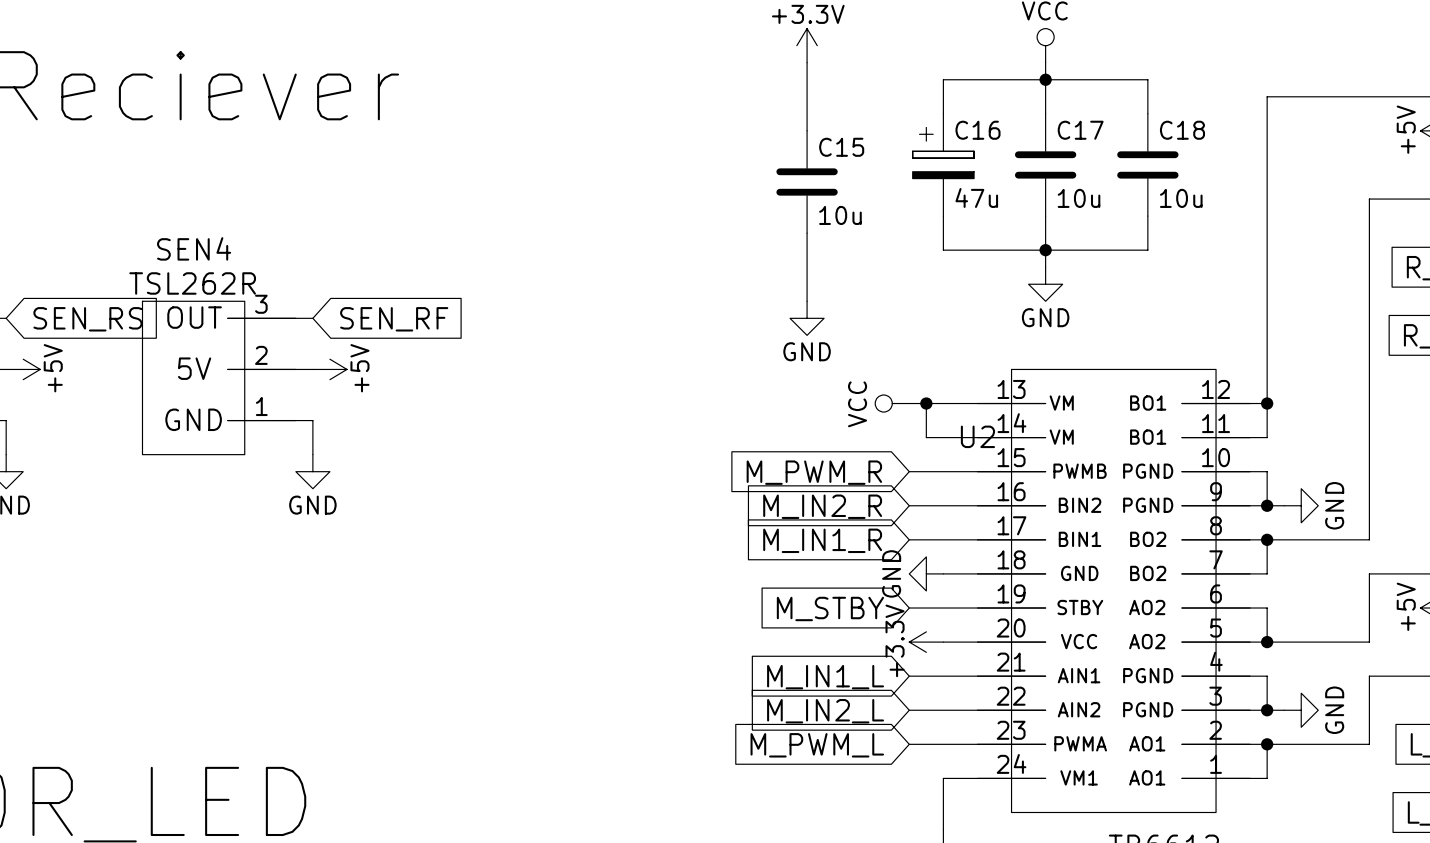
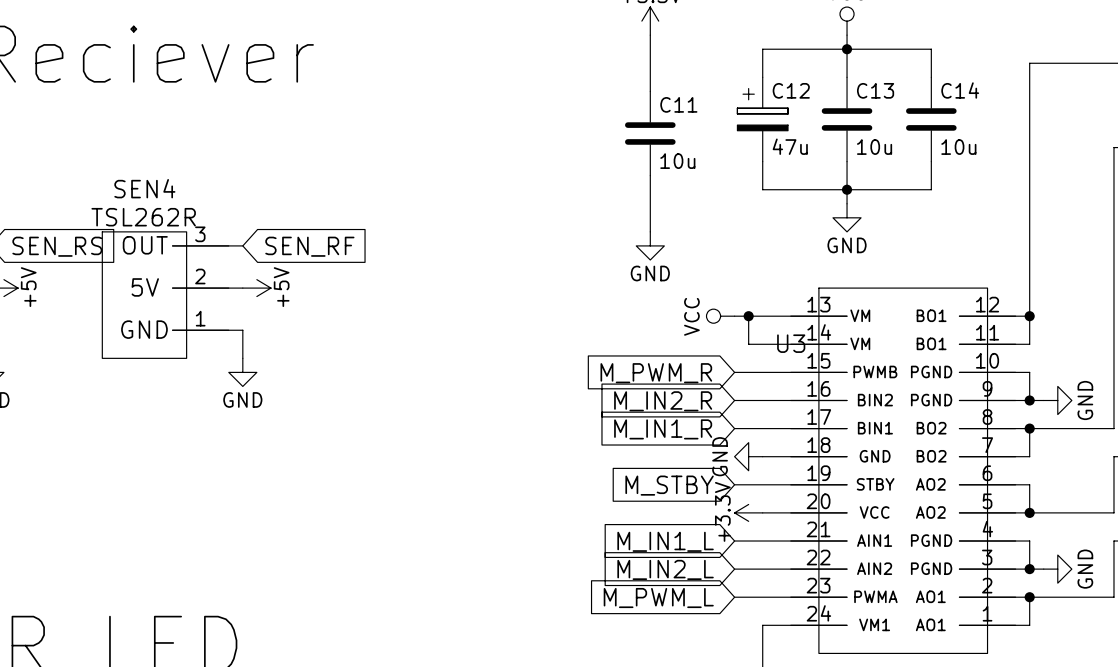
C16 name: C16 (978, 130) -> C12 (791, 90)
C17 name: C17 (1080, 130) -> C13 (875, 90)
C18 name: C18 (1182, 130) -> C14 (960, 90)
C15 name: C15 (841, 147) -> C11 (678, 104)
U2 name: U2 (977, 436) -> U3 (791, 343)

